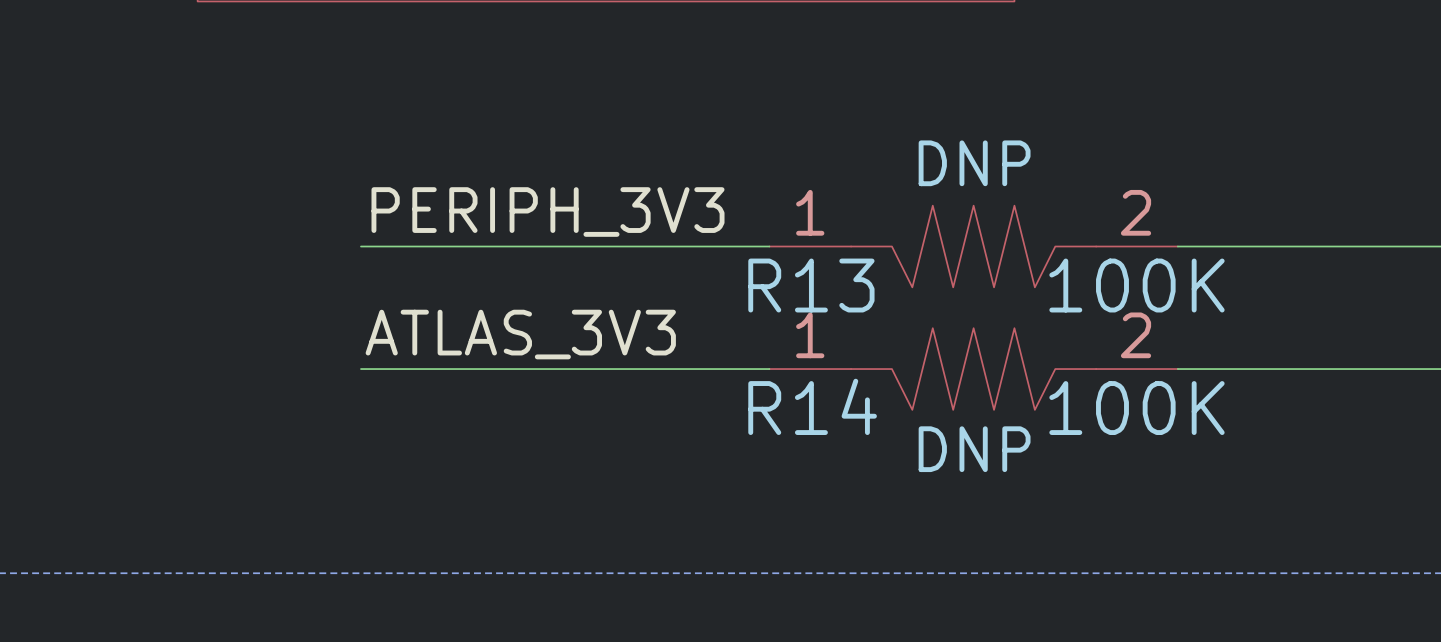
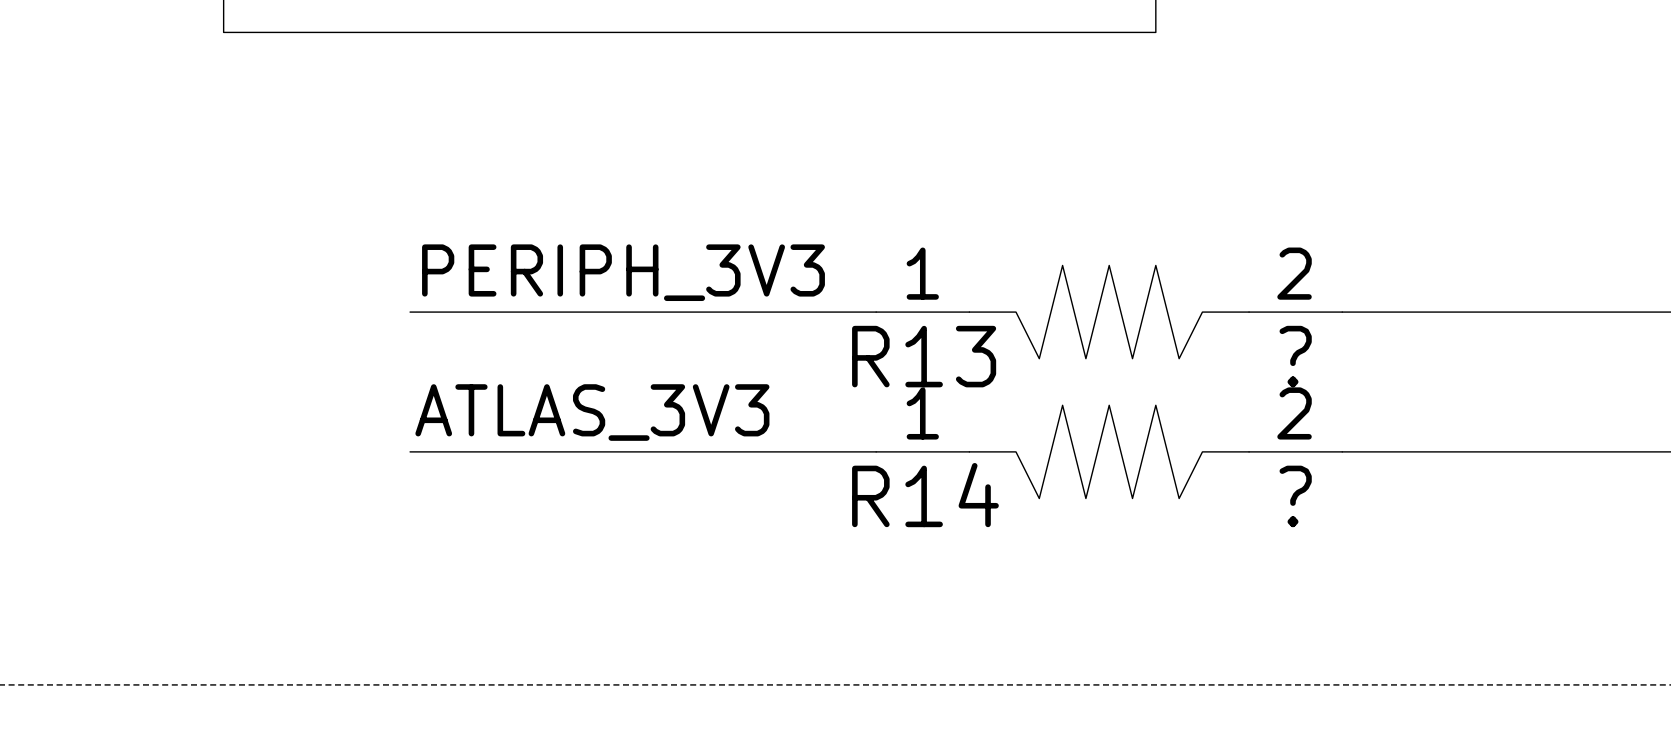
R13 text: DNP (974, 163) -> none
R13 value: 100K (1136, 285) -> ? (1295, 356)
R14 value: 100K (1136, 408) -> ? (1295, 496)
R14 text: DNP (974, 449) -> none

